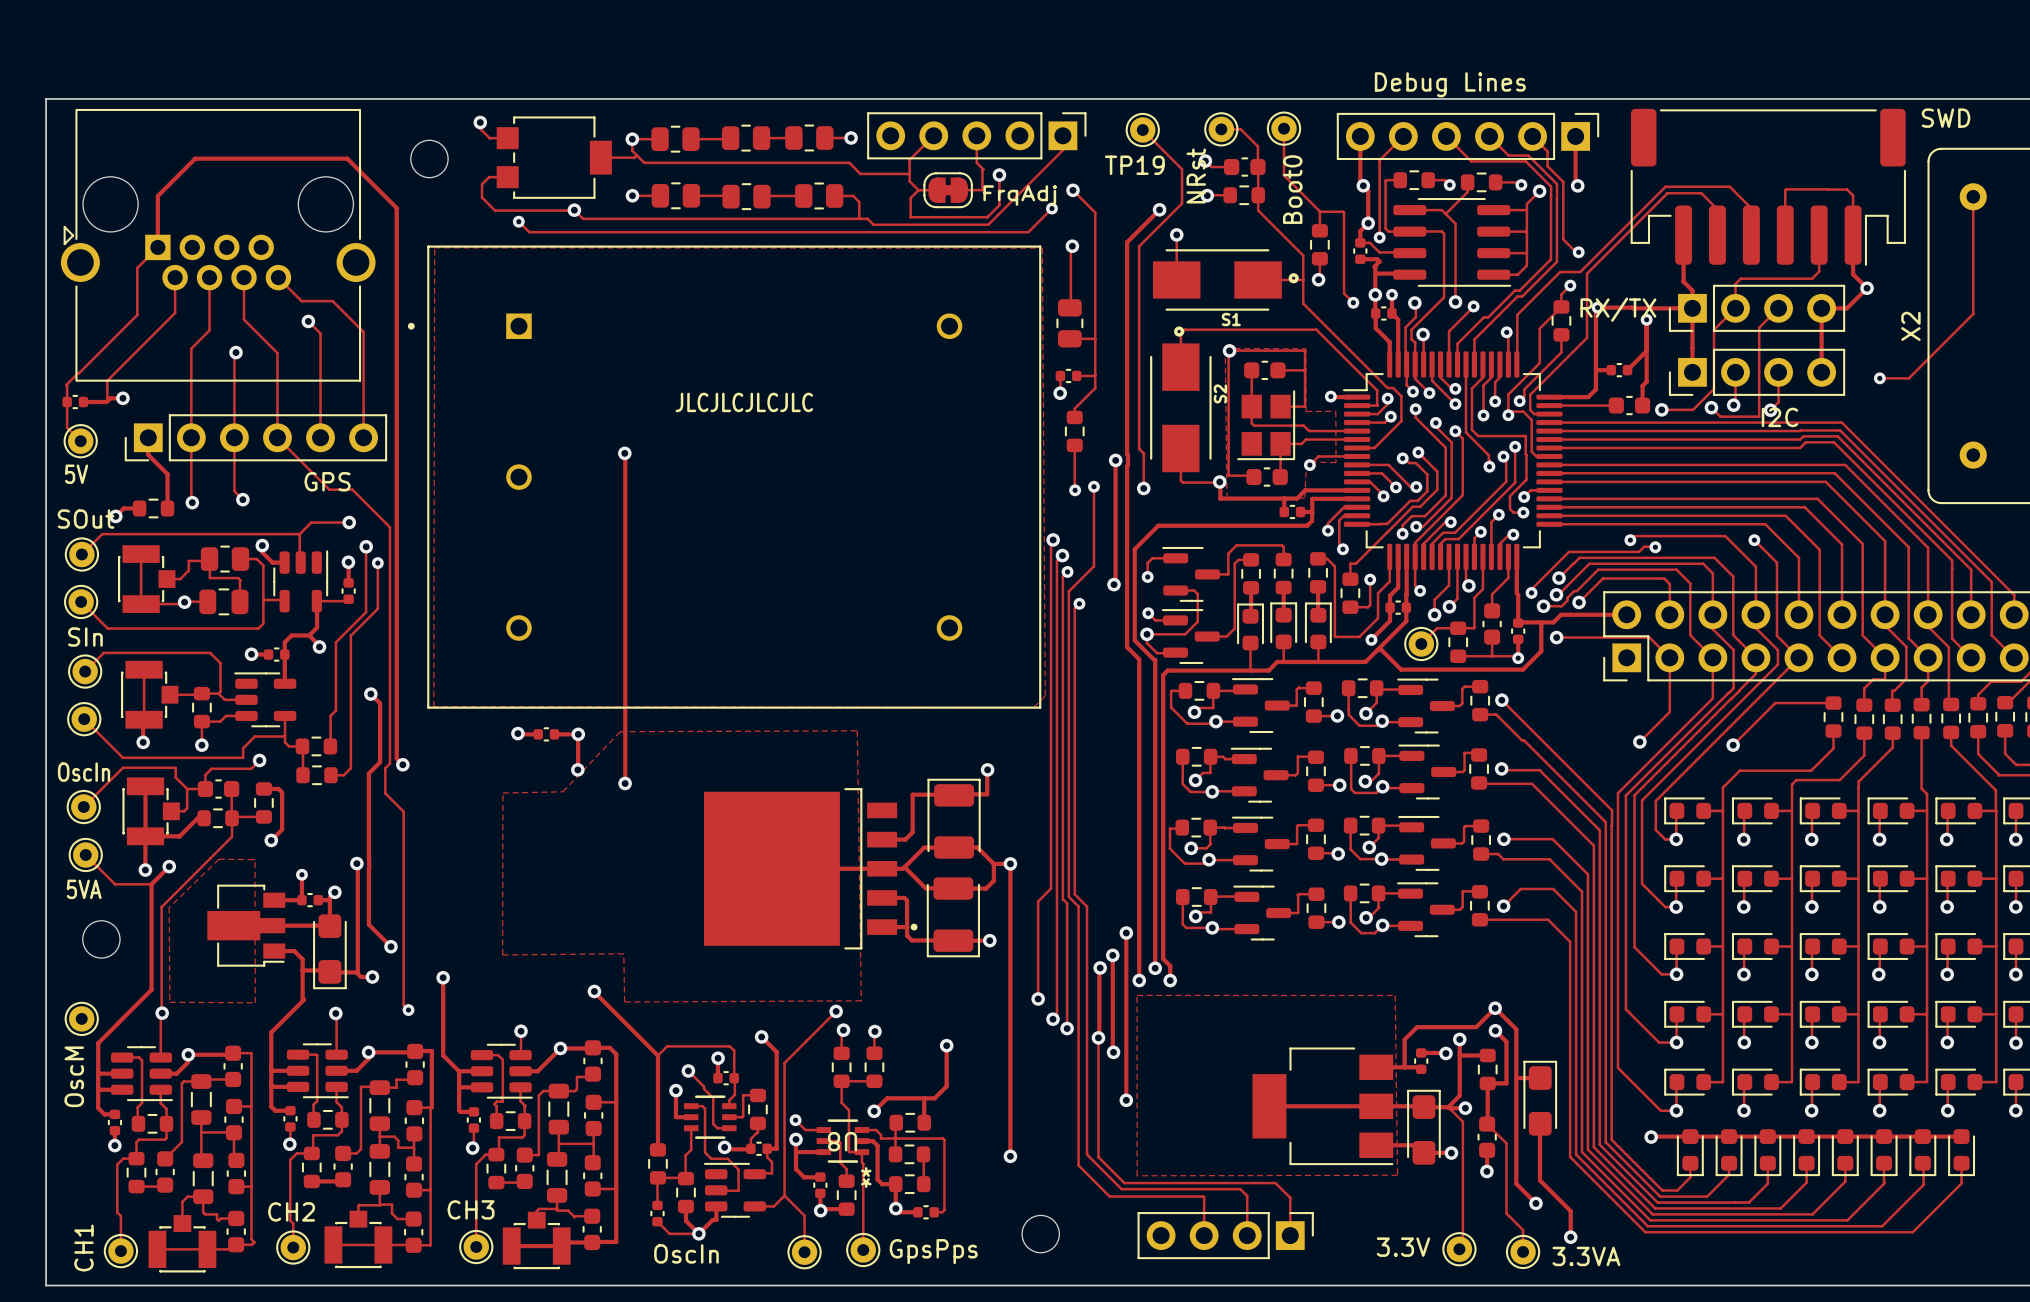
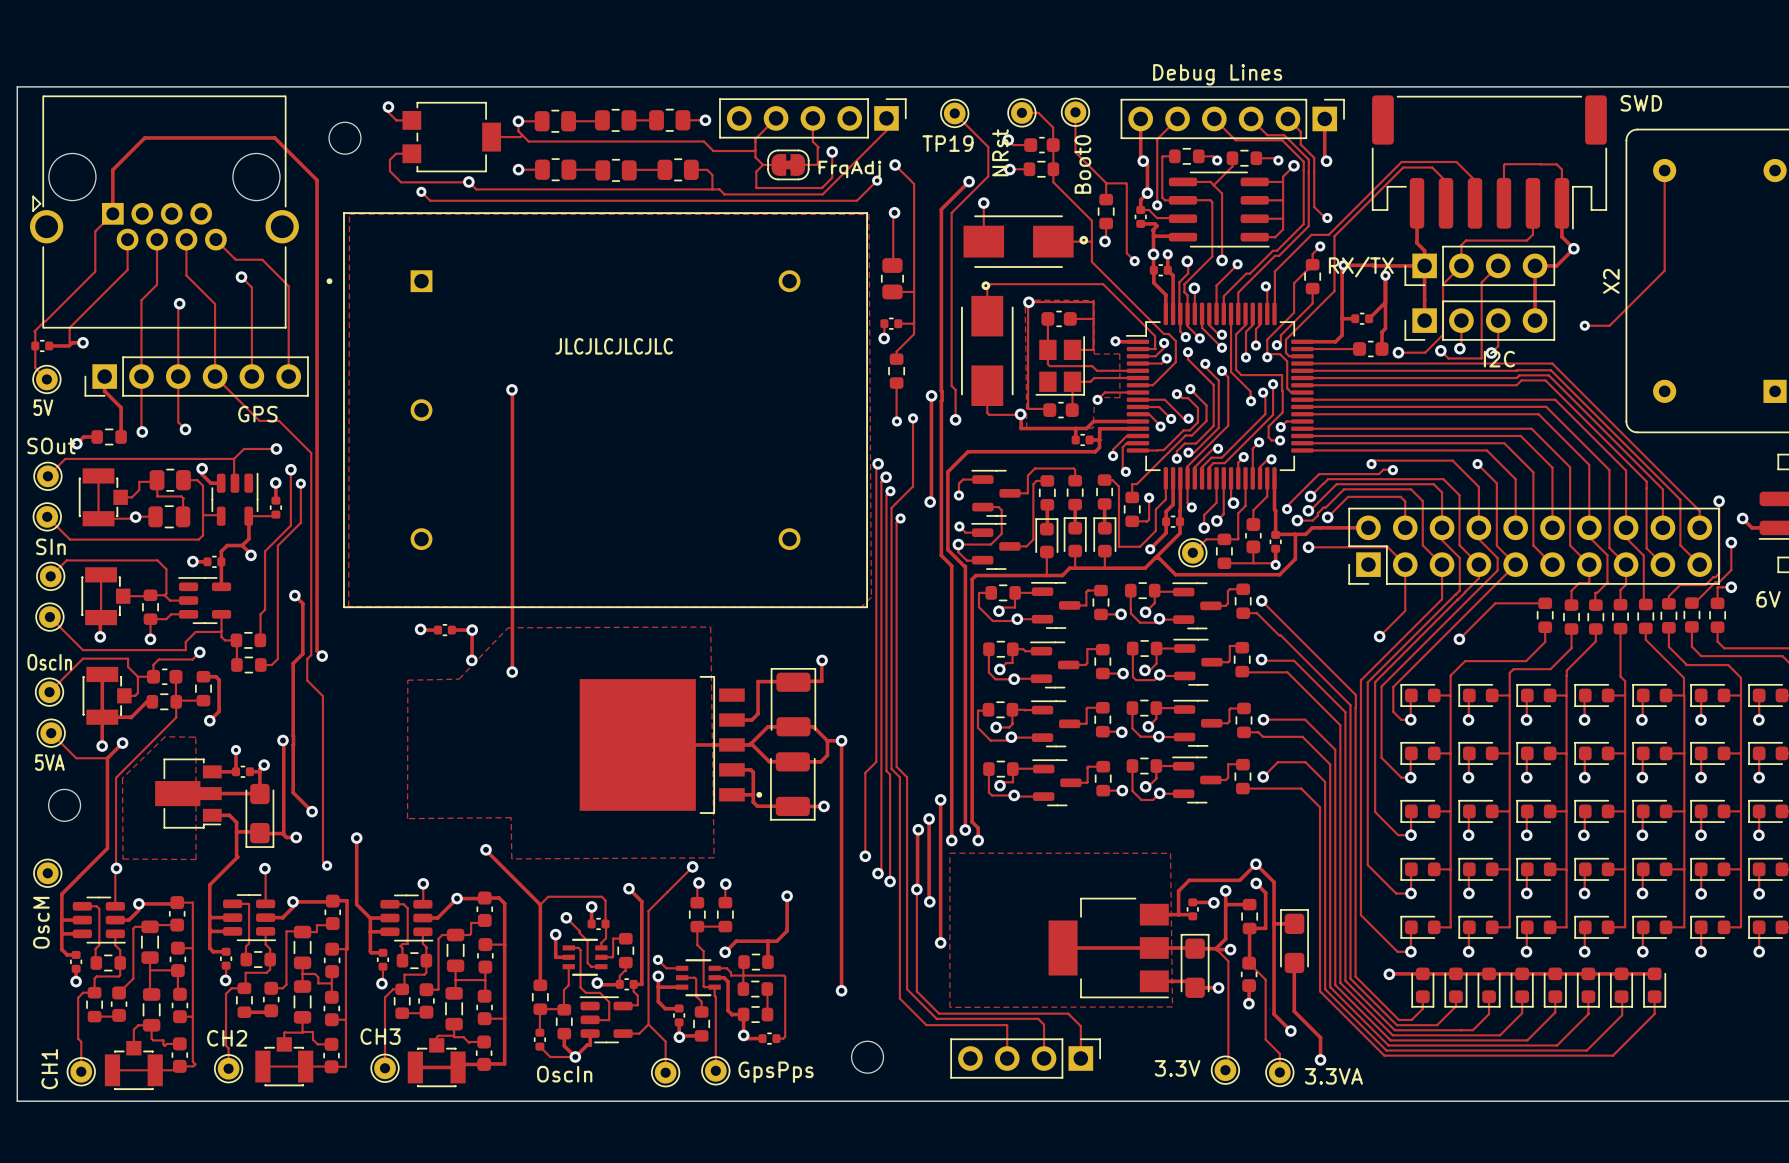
S1 name: S1 (1231, 319) -> none
S2 name: S2 (1220, 393) -> none
U8 footprint: [816, 1119, 870, 1163] -> [675, 959, 721, 997]
U8 name: U8 (842, 1141) -> none

